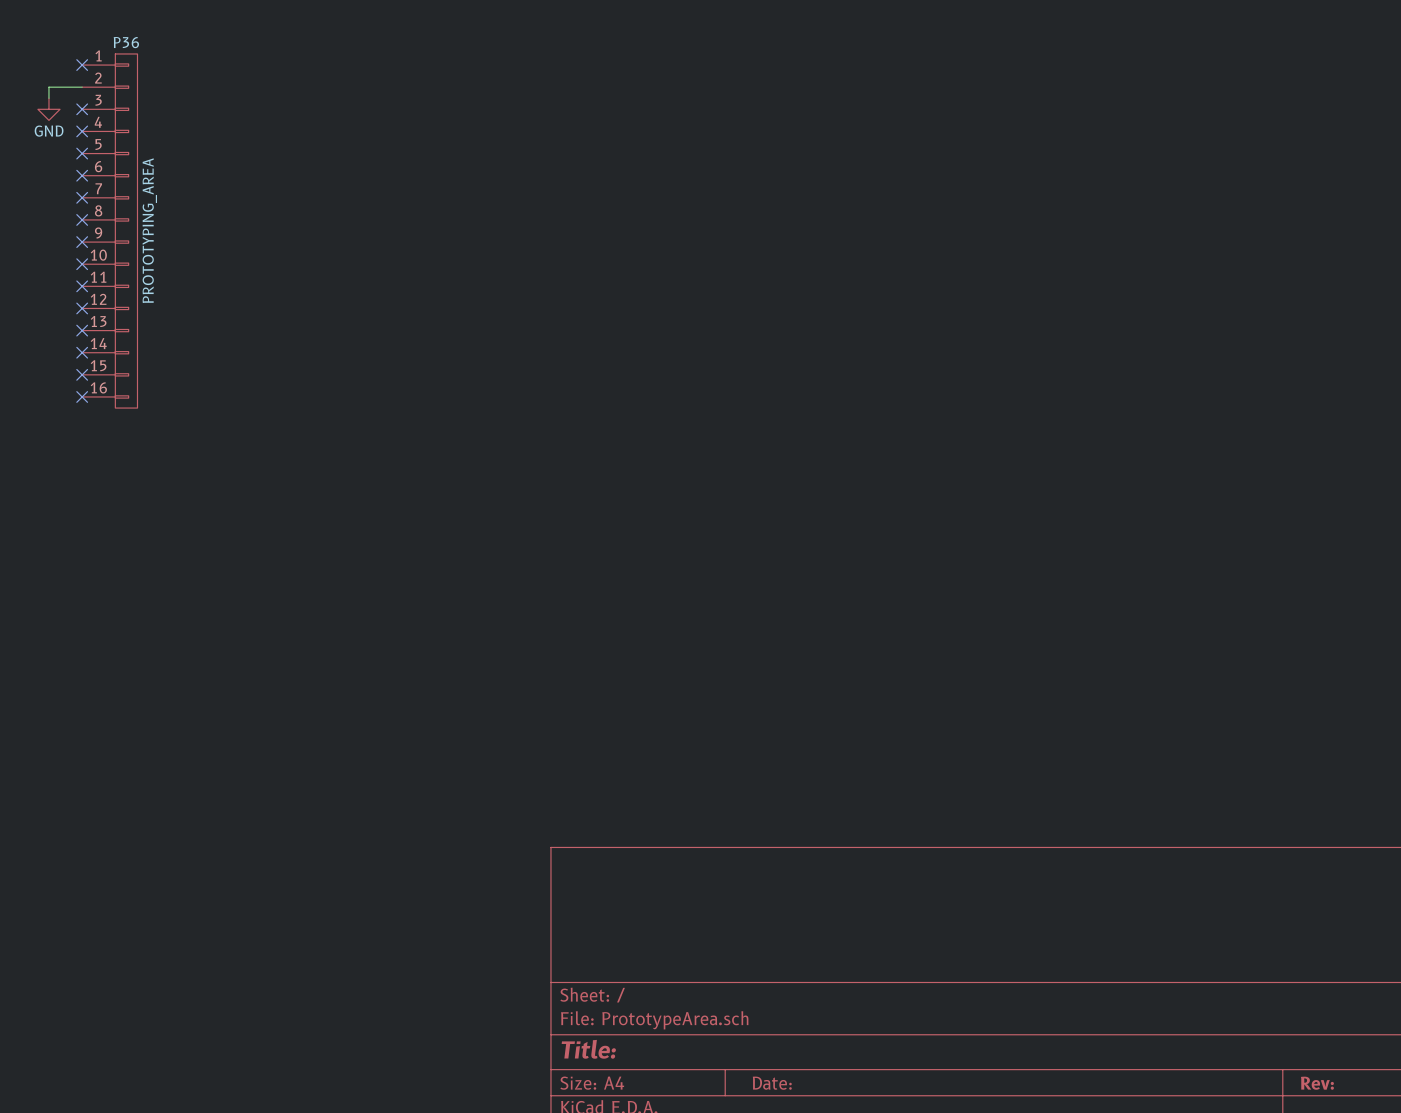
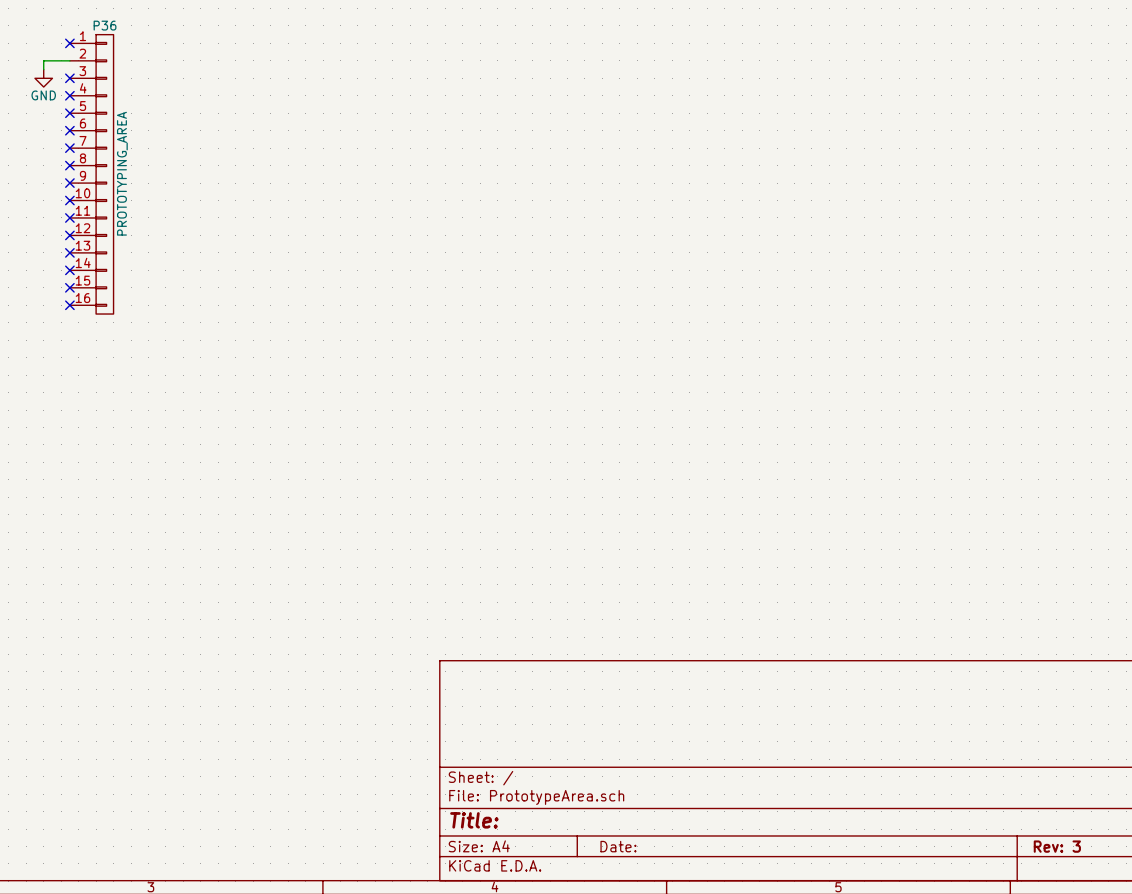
title block: Rev: (1317, 1083) -> Rev: 3 (1057, 846)

